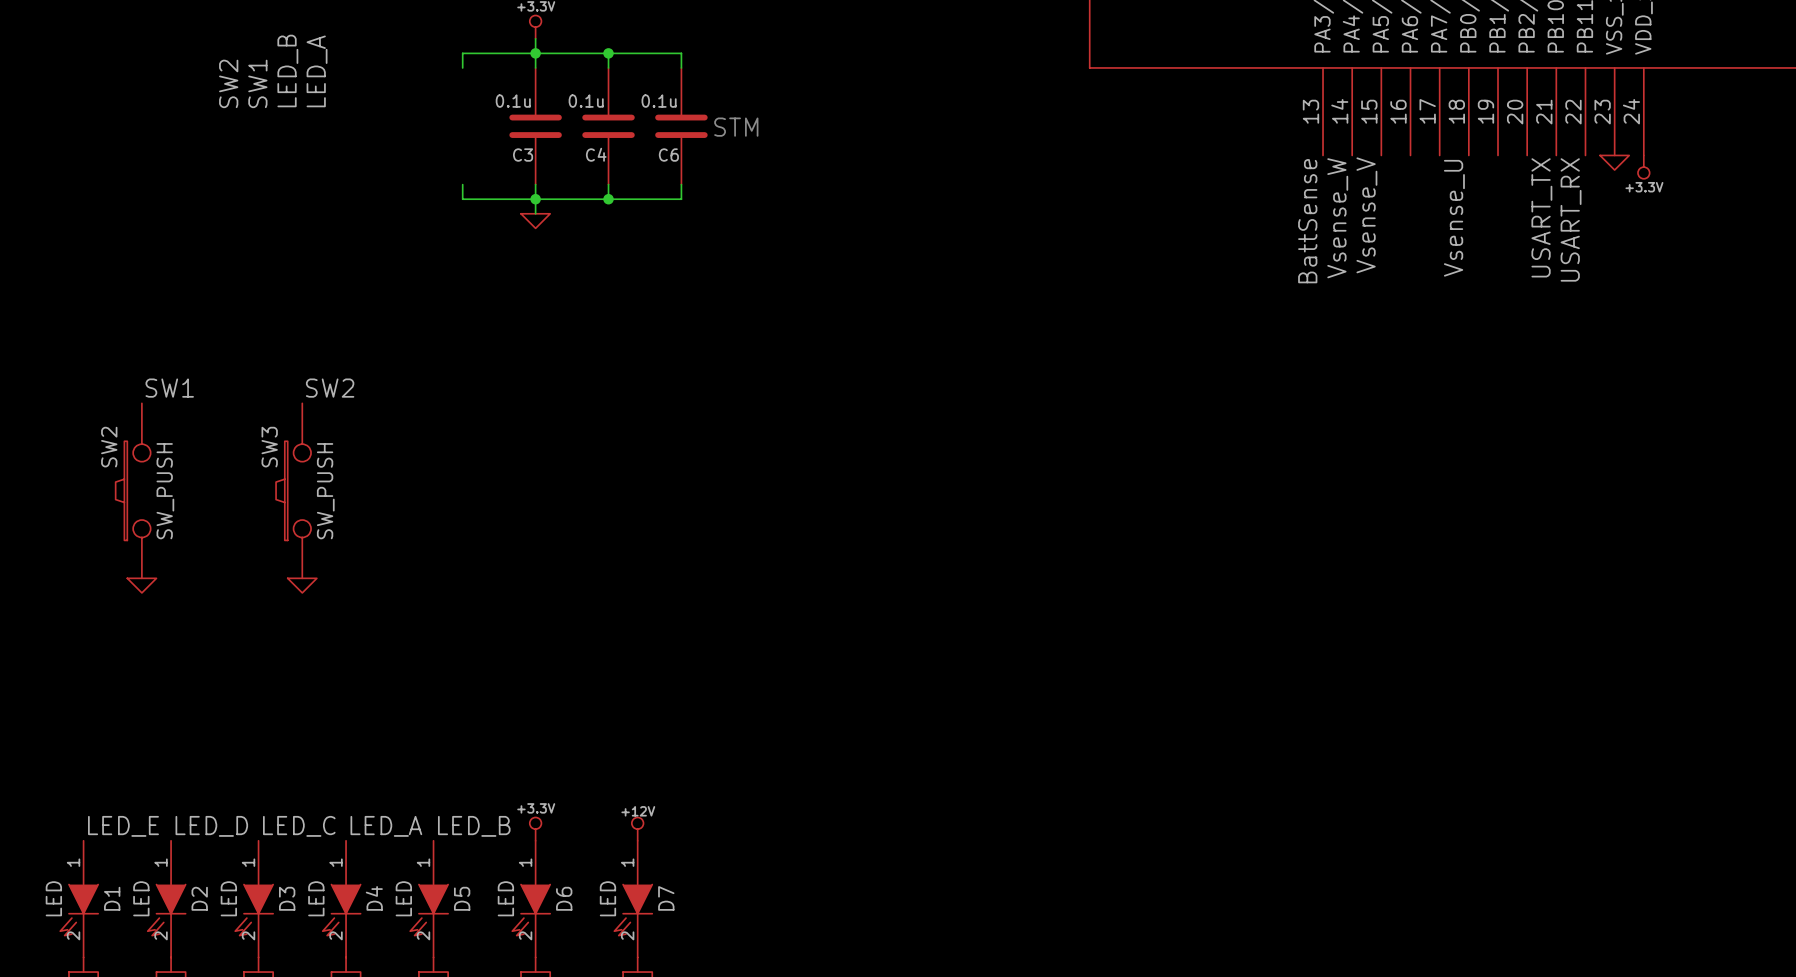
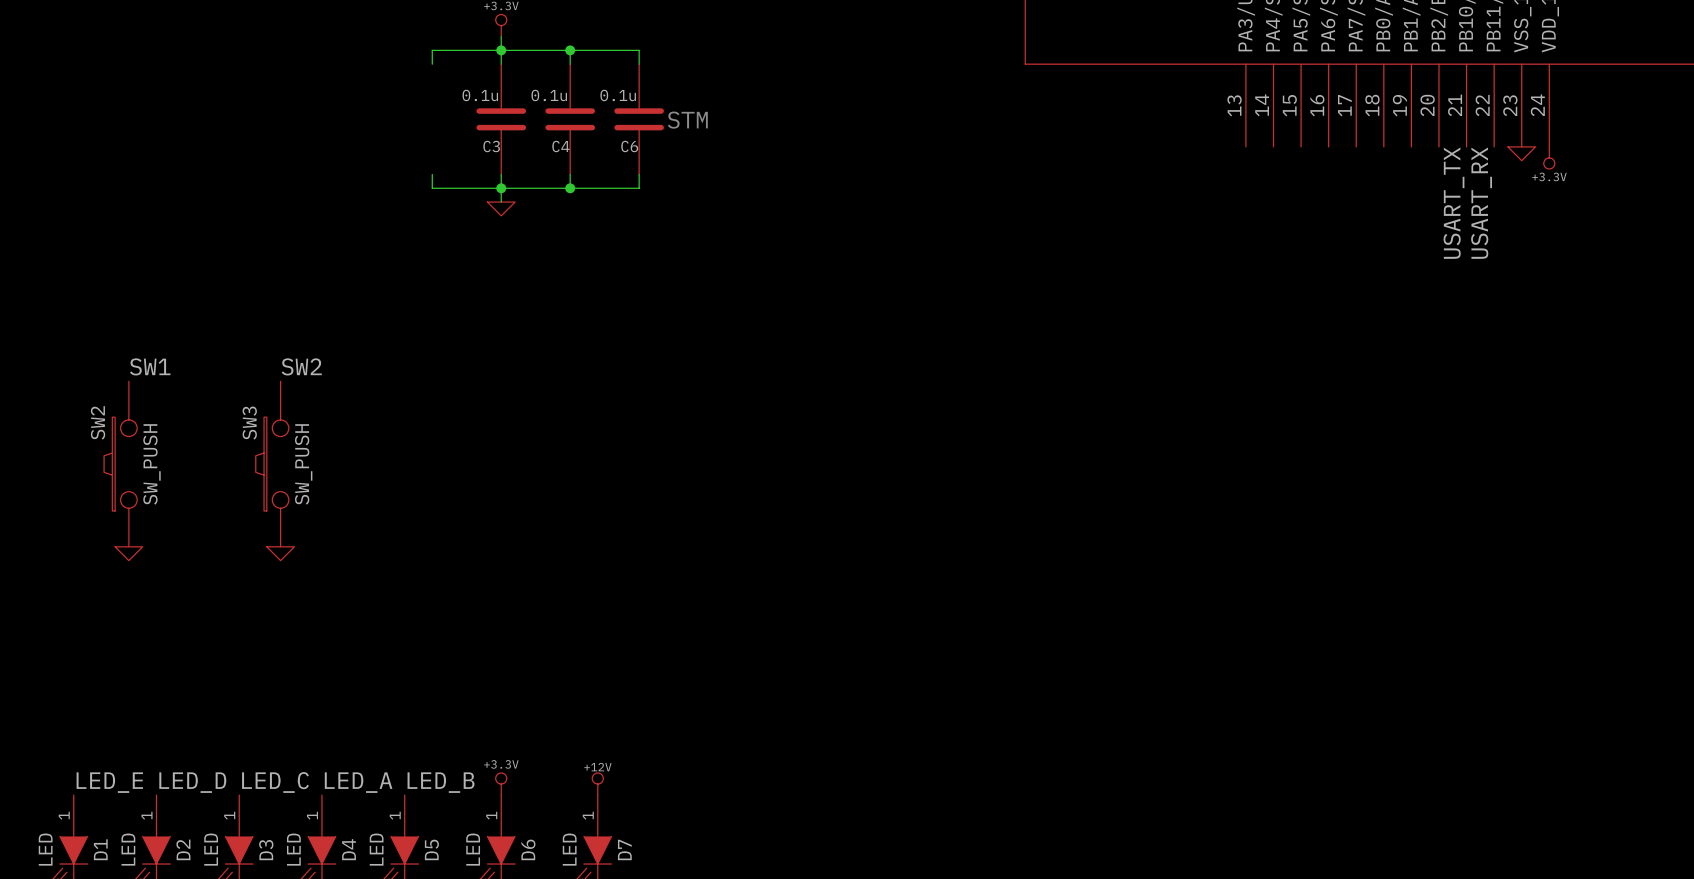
label: LED_B (287, 70) -> none
label: LED_A (317, 71) -> none
label: SW2 (228, 83) -> none
label: SW1 (257, 83) -> none
label: Vsense_V (1366, 215) -> none
label: Vsense_W (1337, 218) -> none
label: Vsense_U (1454, 218) -> none
label: BattSense (1307, 221) -> none

